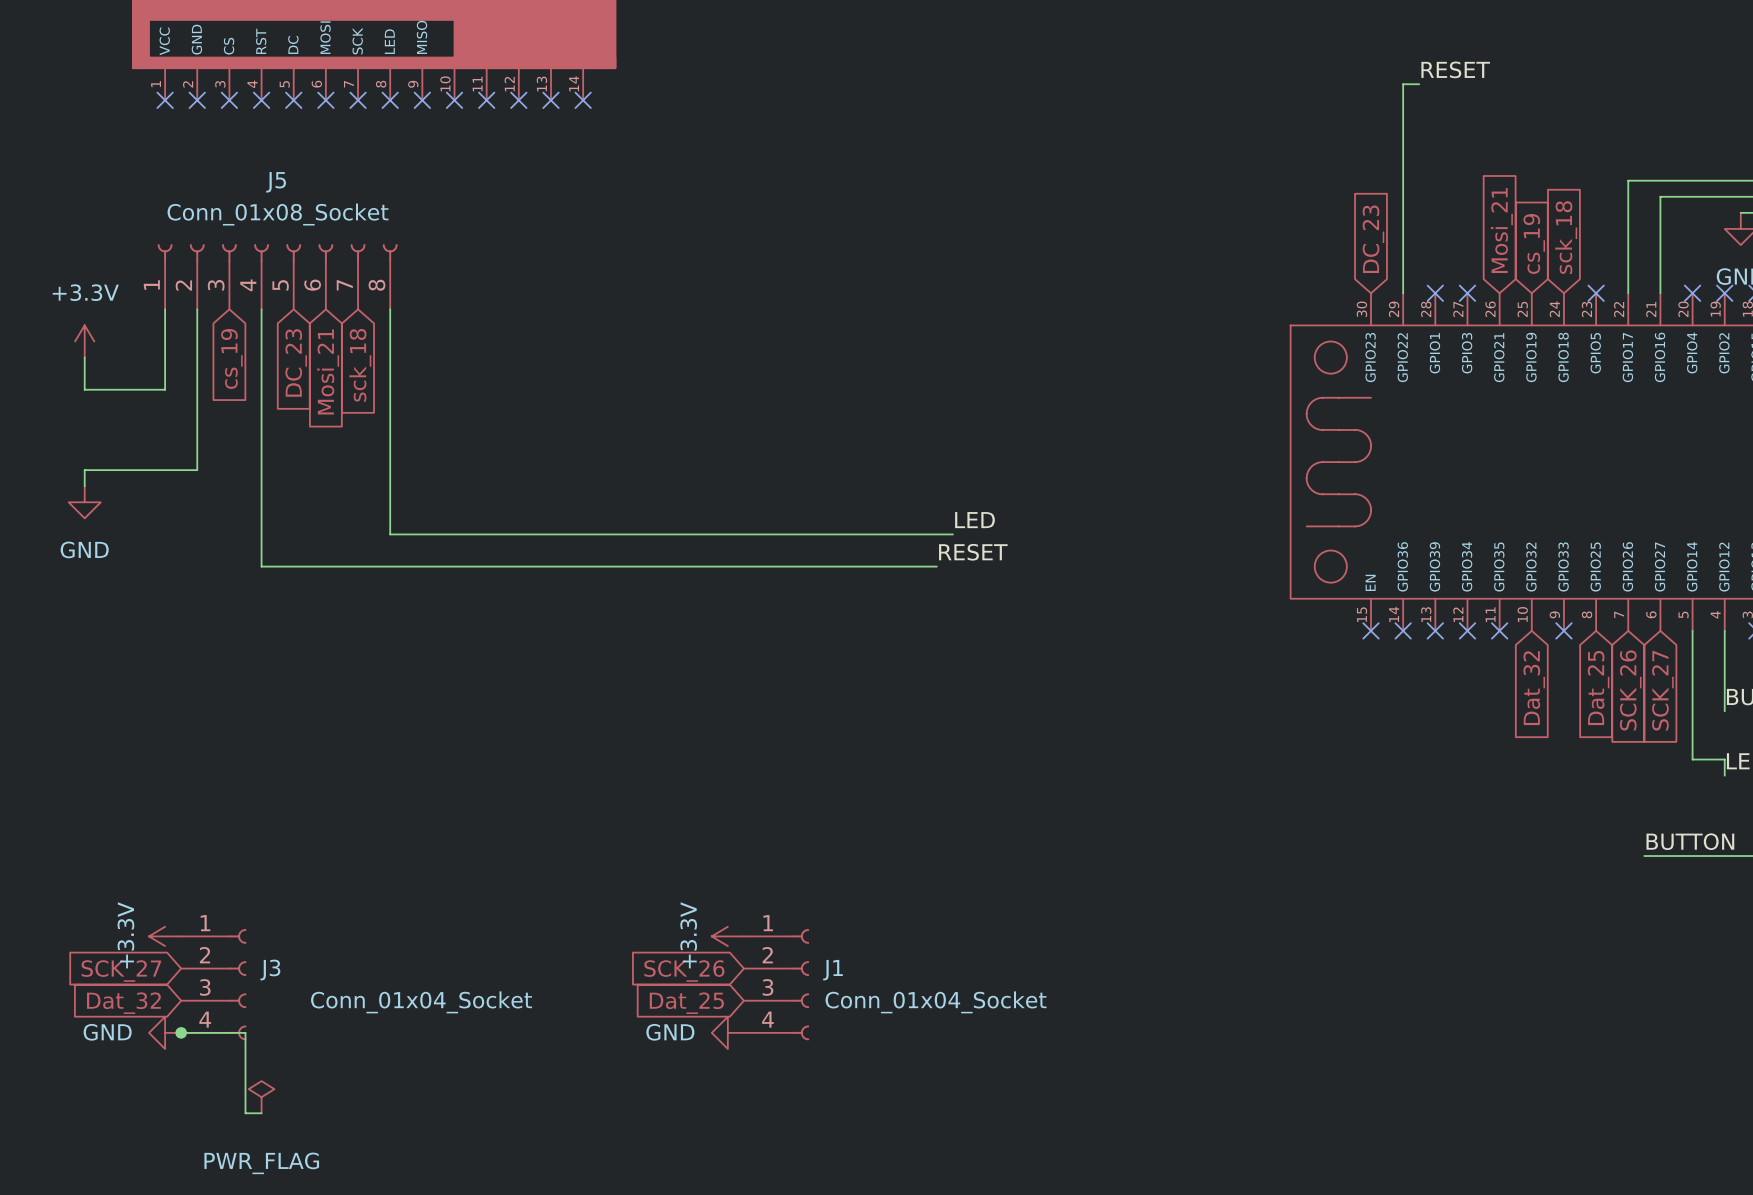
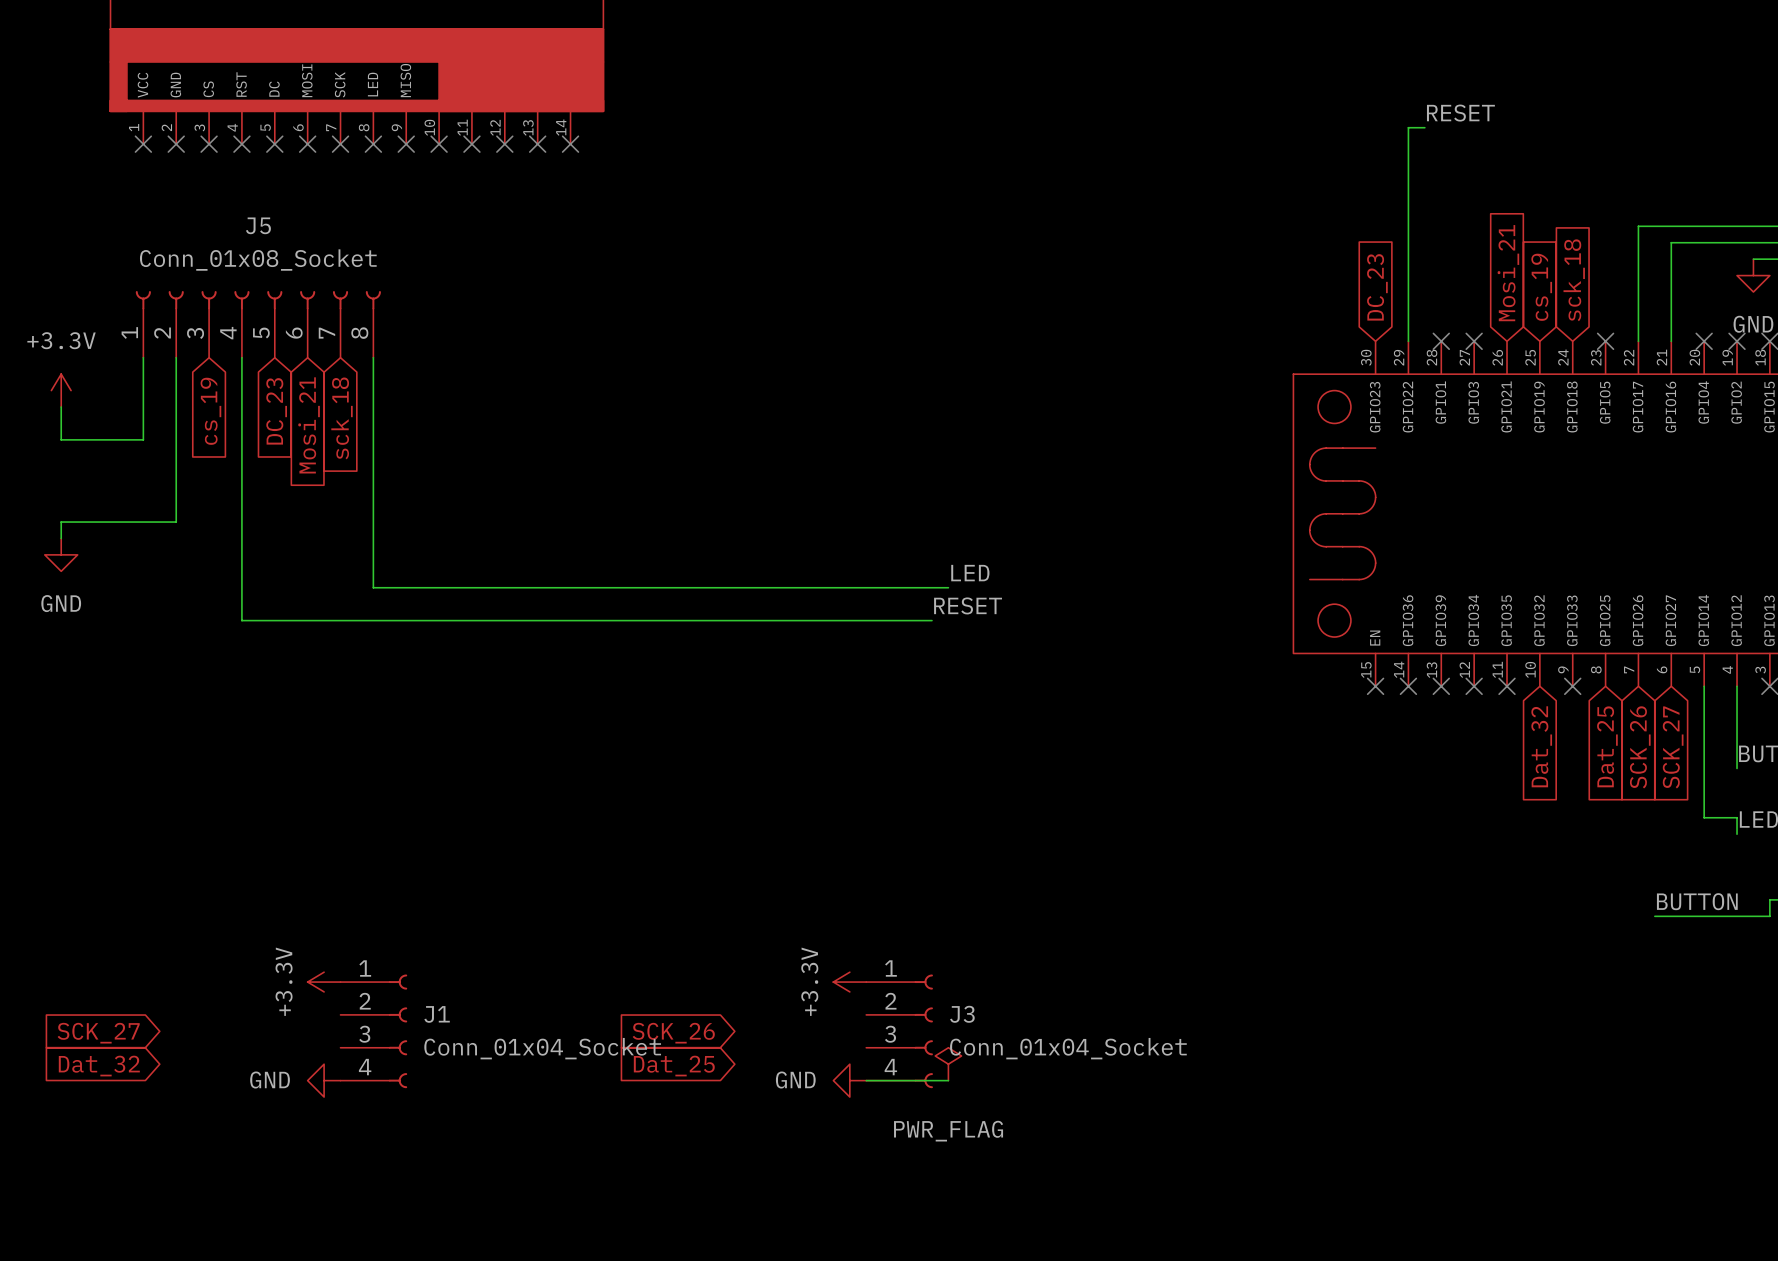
power symbol position: +3.3V (165, 936) -> +3.3V (324, 982)
power symbol position: +3.3V (727, 936) -> +3.3V (849, 982)
J3 position: (213, 984) -> (899, 1031)
J1 position: (776, 984) -> (373, 1031)
power symbol: none -> PWR_FLAG (948, 1064)
J3 value position: Conn_01x04_Socket (421, 1002) -> Conn_01x04_Socket (1068, 1048)
wire: none -> (866, 1080) (948, 1080)
power symbol position: GND (165, 1032) -> GND (324, 1080)
wire: (181, 1032) (245, 1032) (245, 1113) (261, 1113) -> none
junction: (181, 1032) -> none
power symbol position: GND (727, 1032) -> GND (849, 1080)
power symbol: PWR_FLAG (261, 1097) -> none

